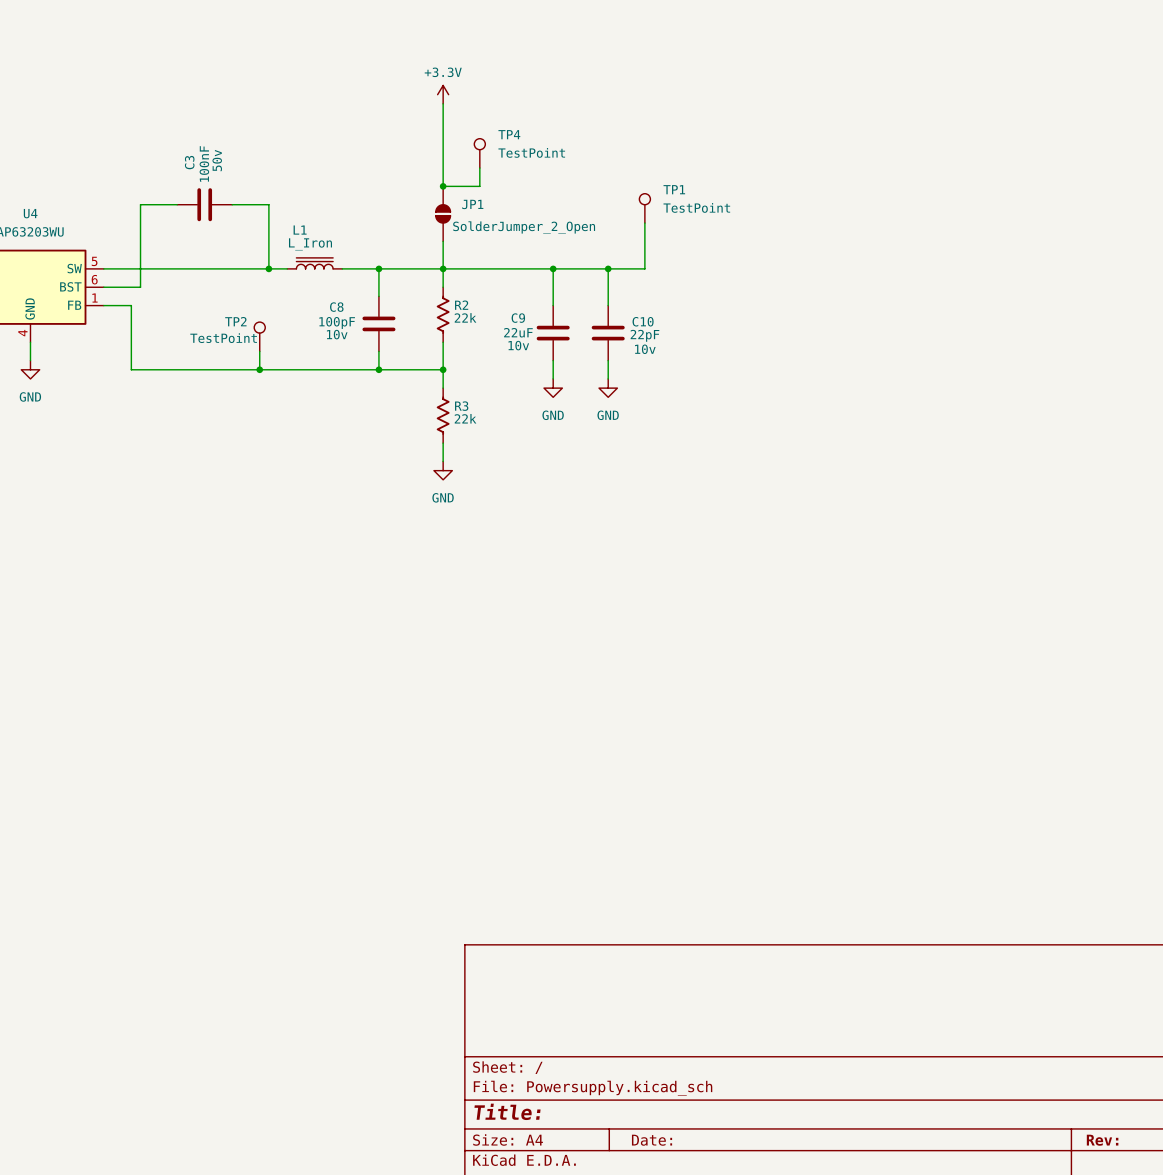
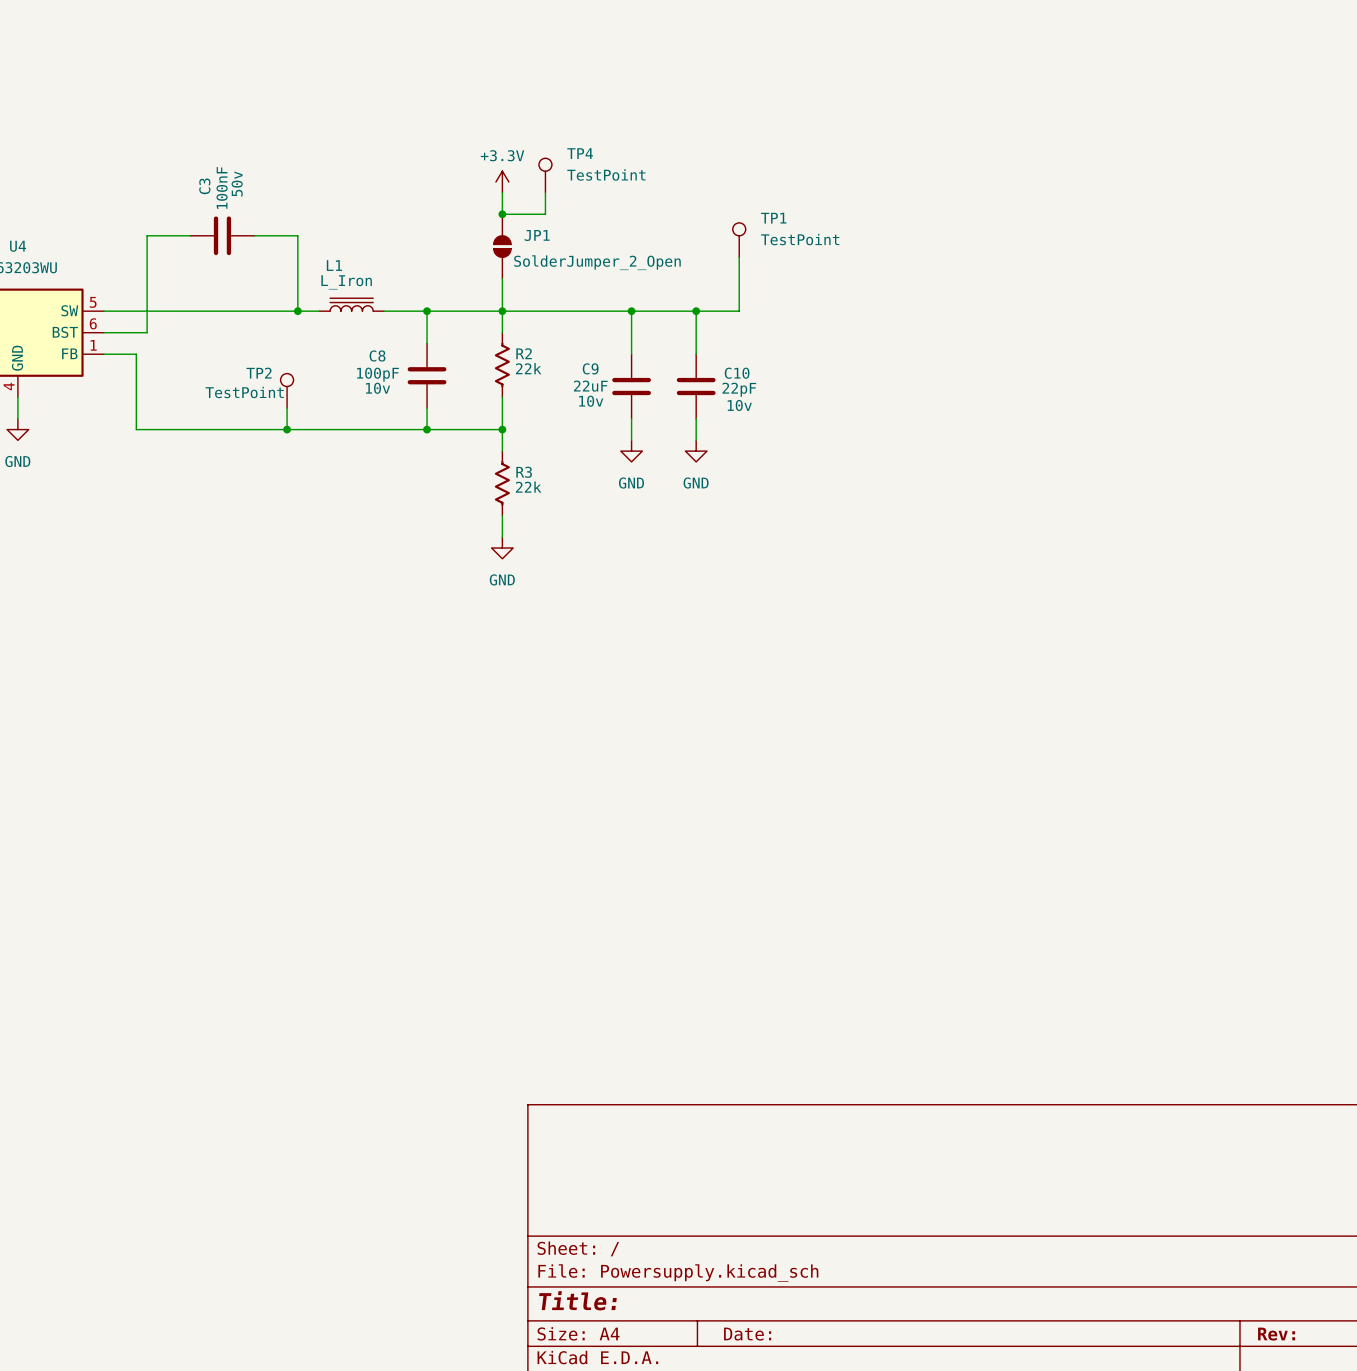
power symbol position: +3.3V (443, 94) -> +3.3V (502, 181)
wire: (443, 103) (443, 168) -> none

